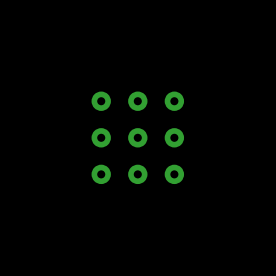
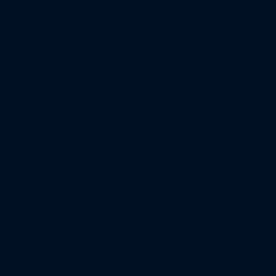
part: (137, 137) -> none

